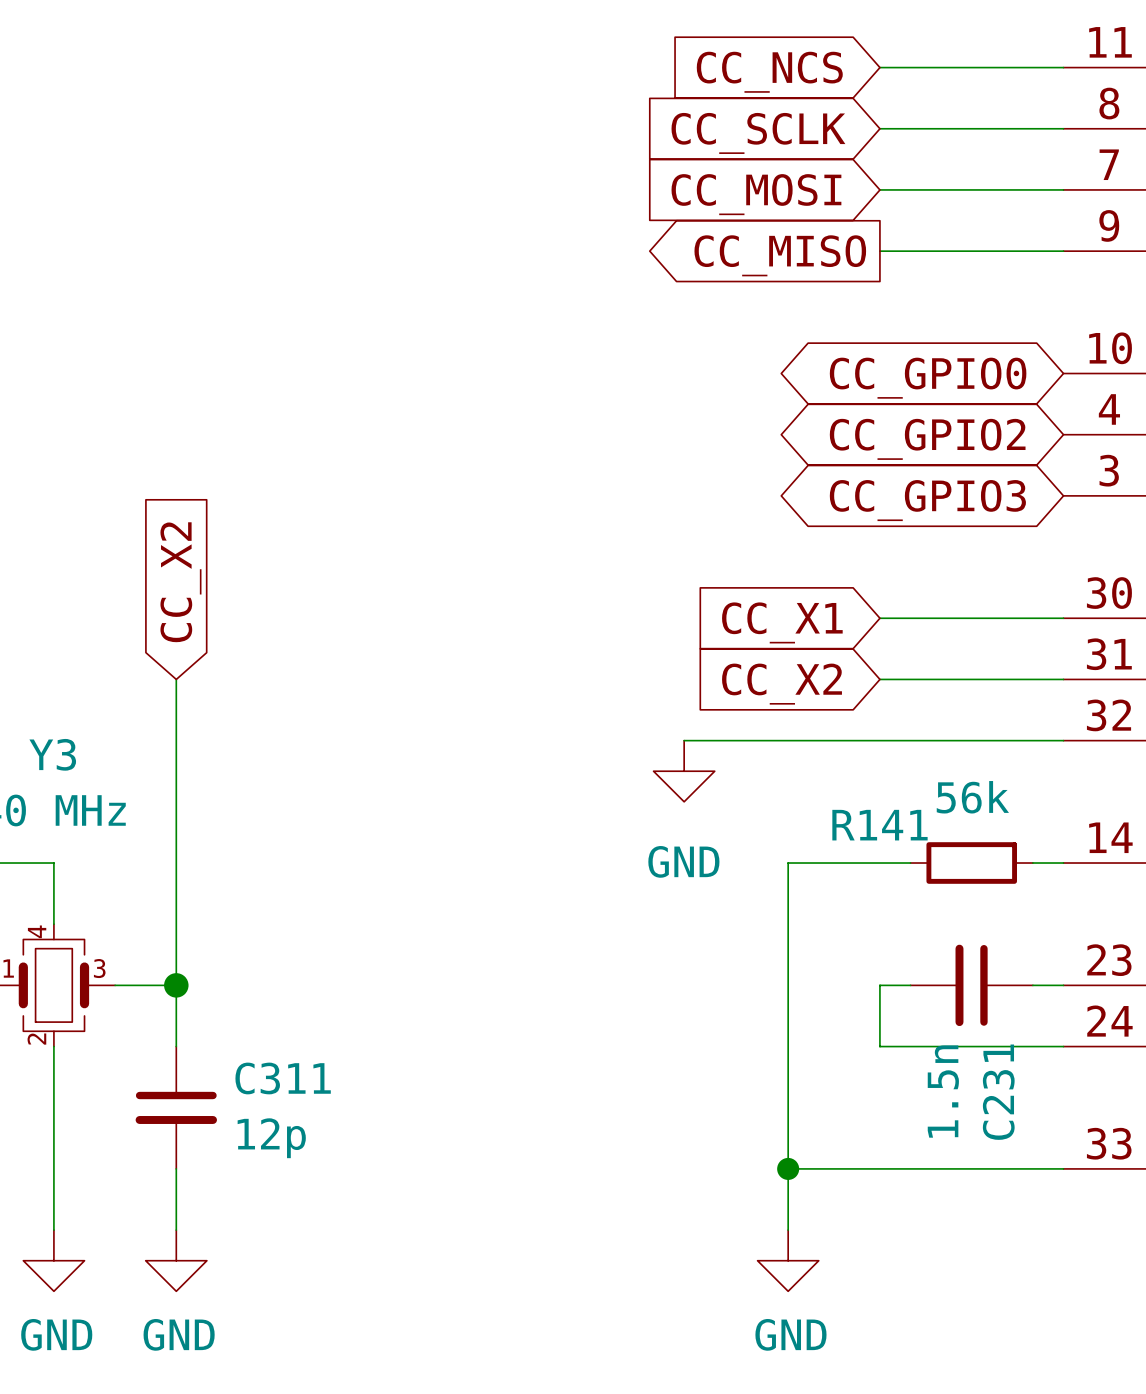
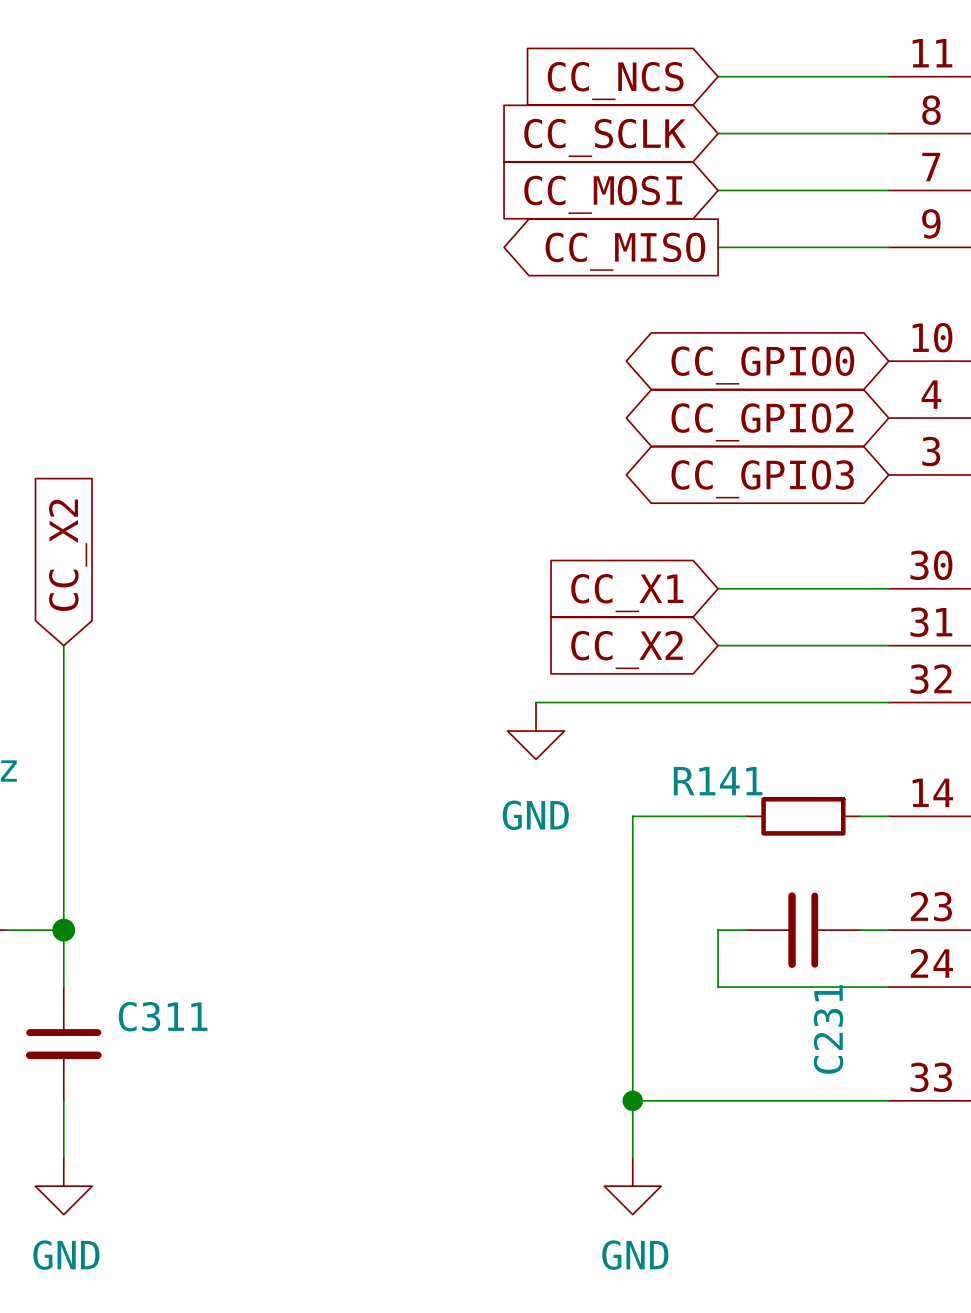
R141 value: 56k (972, 797) -> none
C231 value: 1.5n (943, 1091) -> none
C311 value: 12p (271, 1138) -> none

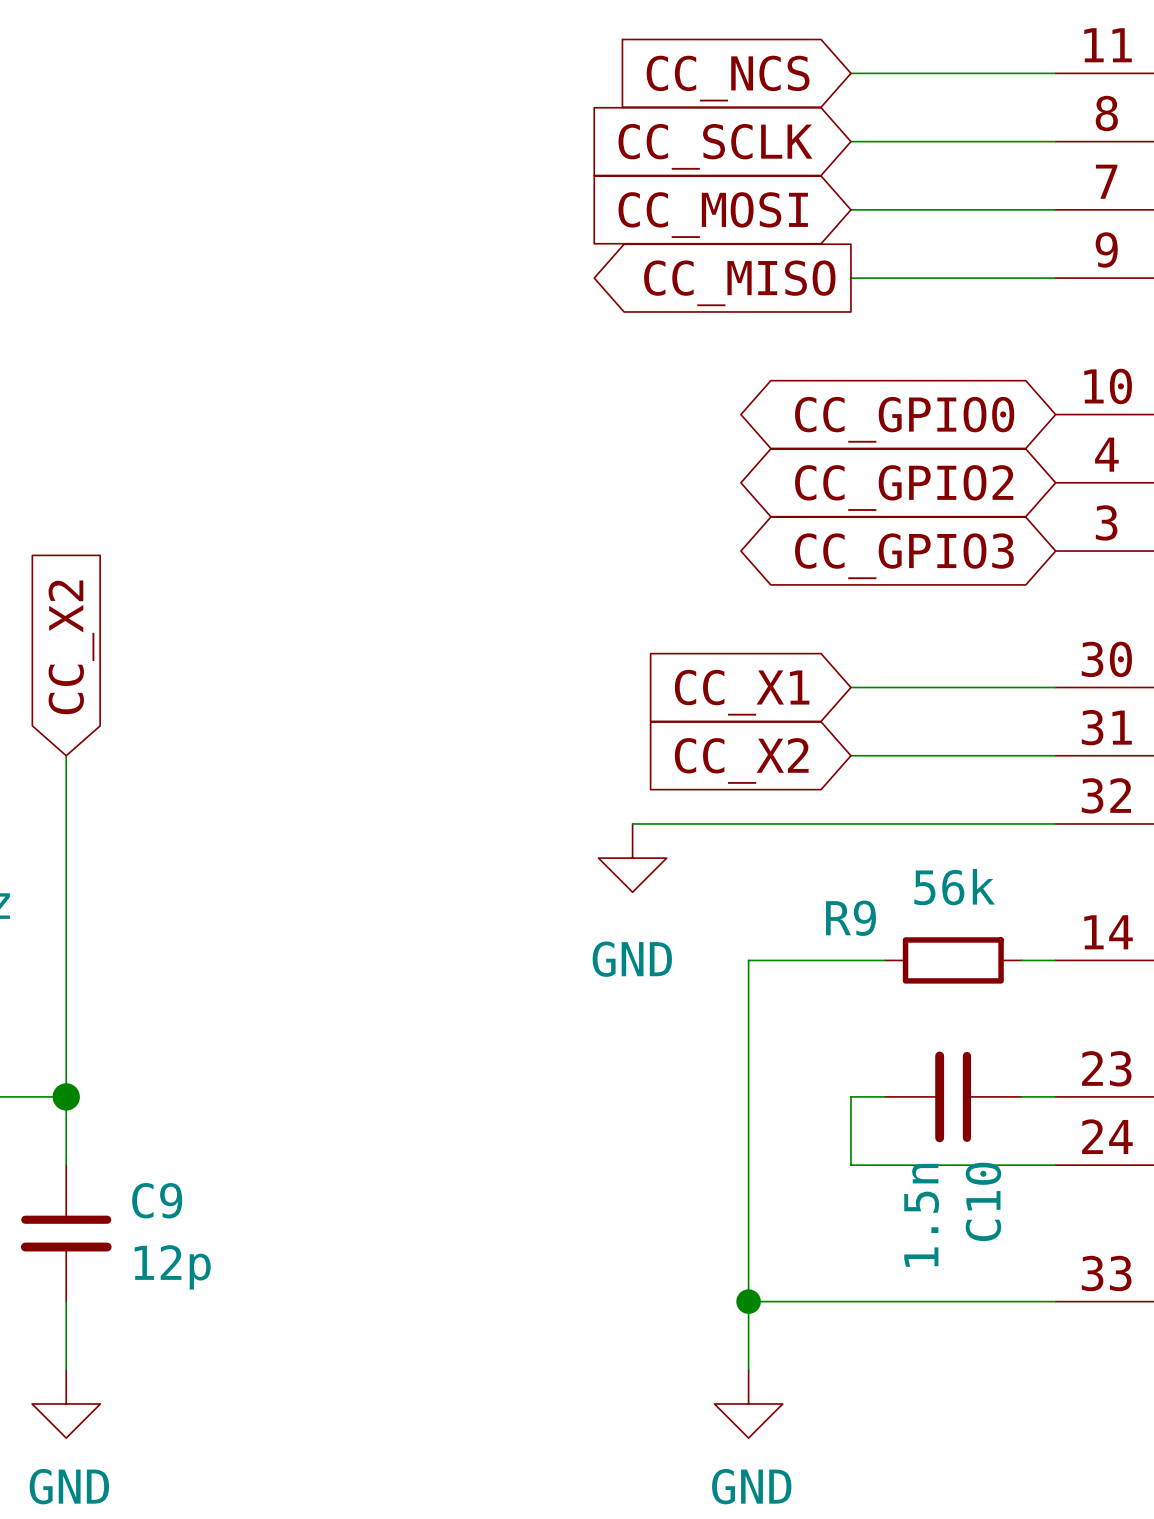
R141 value: none -> 56k (954, 887)
R141 name: R141 (718, 781) -> R9 (850, 918)
C311 name: C311 (163, 1016) -> C9 (157, 1200)
C231 value: none -> 1.5n (921, 1215)
C231 name: C231 (828, 1029) -> C10 (983, 1201)
C311 value: none -> 12p (172, 1267)

